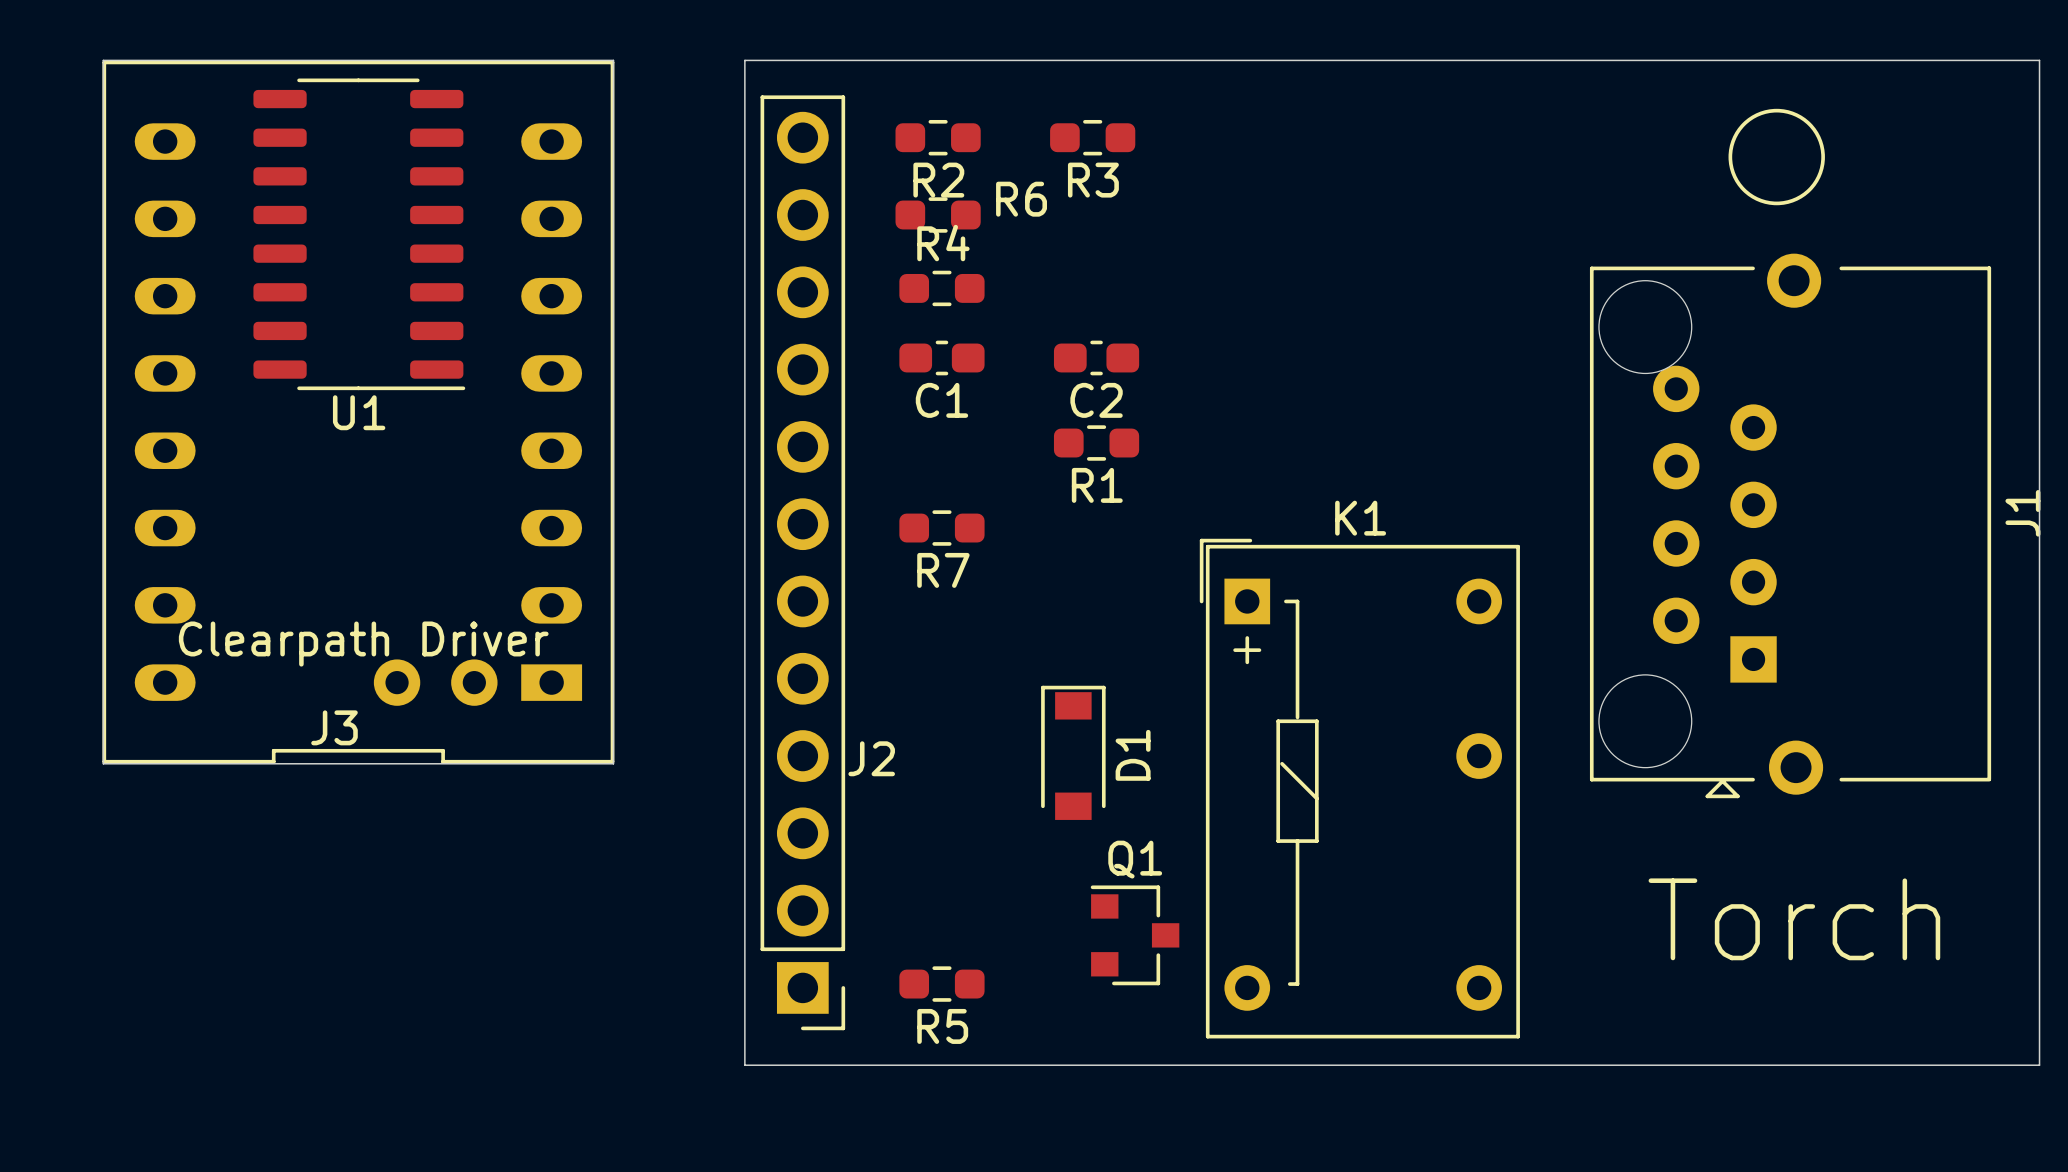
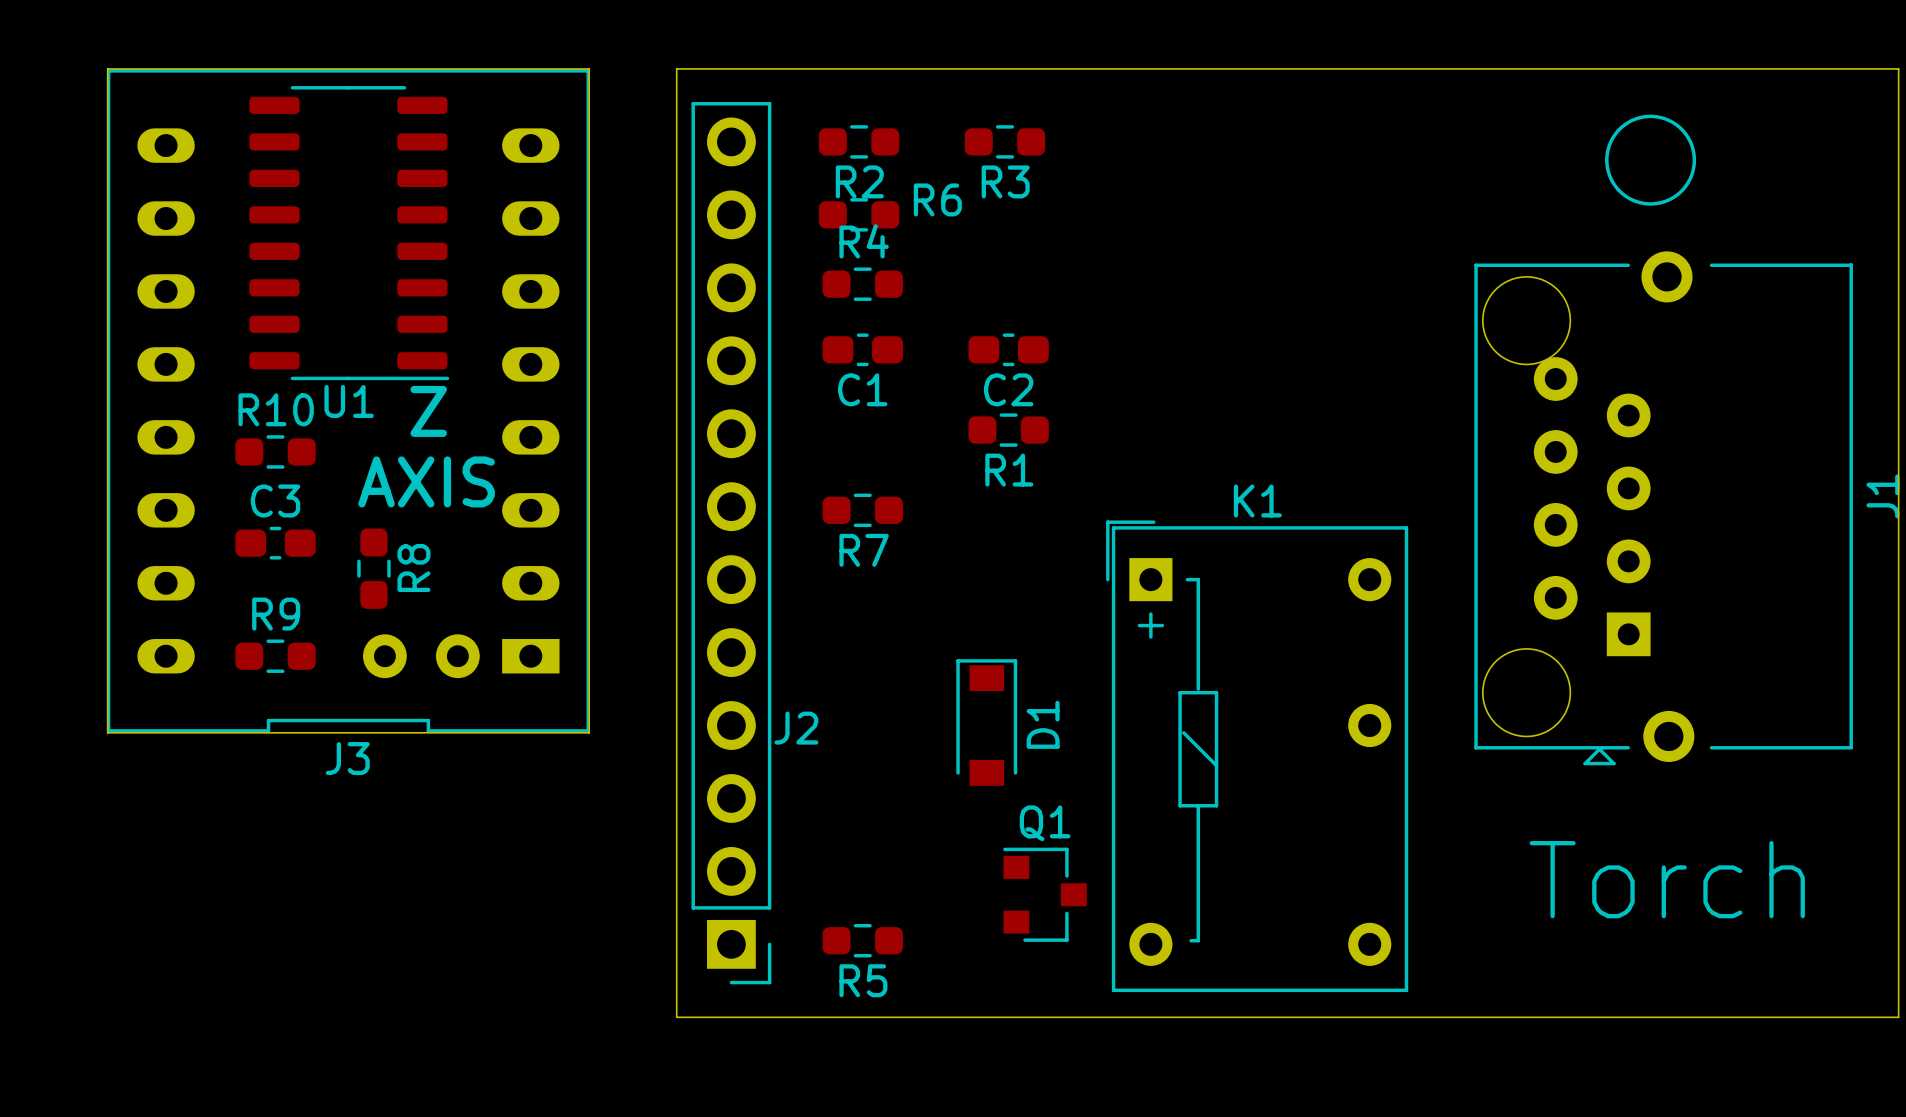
board edge: (141, 60) (103, 60) (103, 763) (141, 763) -> (107, 68) (107, 732)
board edge: (613, 60) (613, 763) -> (552, 68) (589, 68) (589, 732) (552, 732)
U1 position: (359, 234) -> (349, 233)
J3 position: (358, 412) -> (348, 400)
text: none -> Z (428, 411)
R10: none -> (275, 451)
text: none -> AXIS (426, 481)
C3: none -> (275, 543)
R8: none -> (373, 568)
text: Clearpath Driver (363, 644) -> none
R9: none -> (275, 656)
J3 name position: J3 (334, 727) -> J3 (347, 758)

